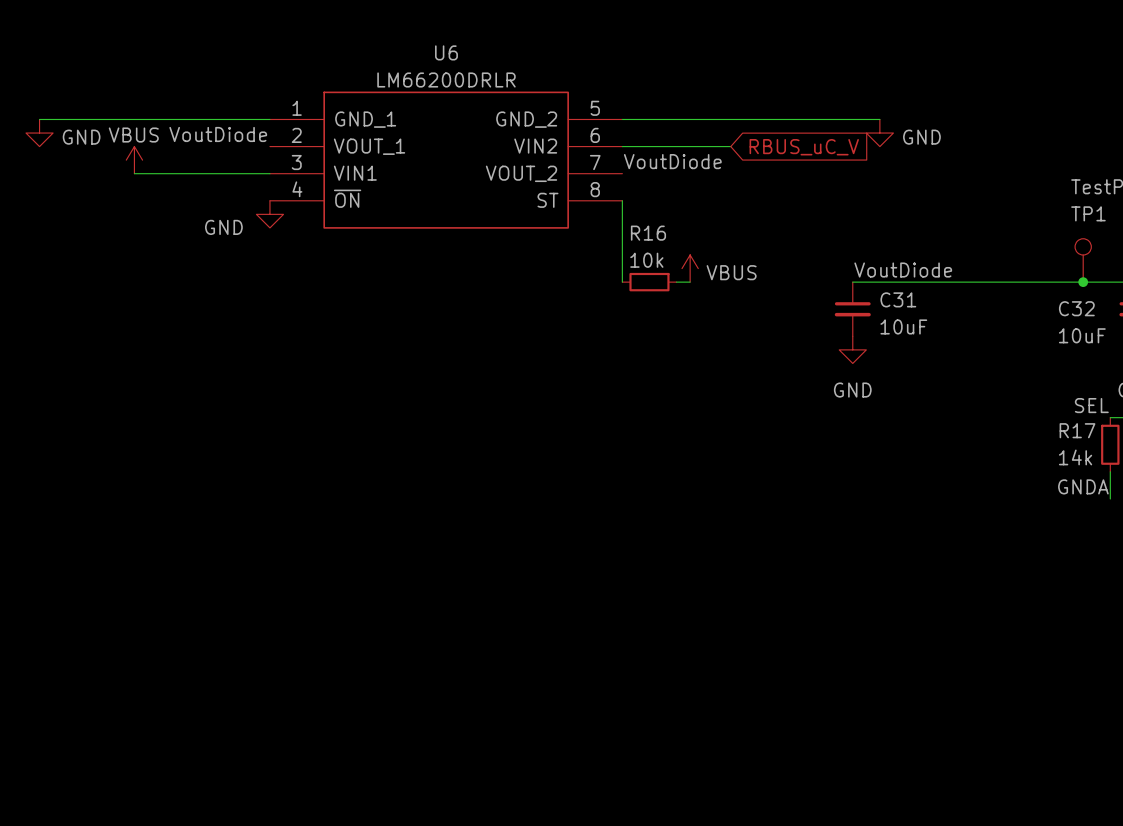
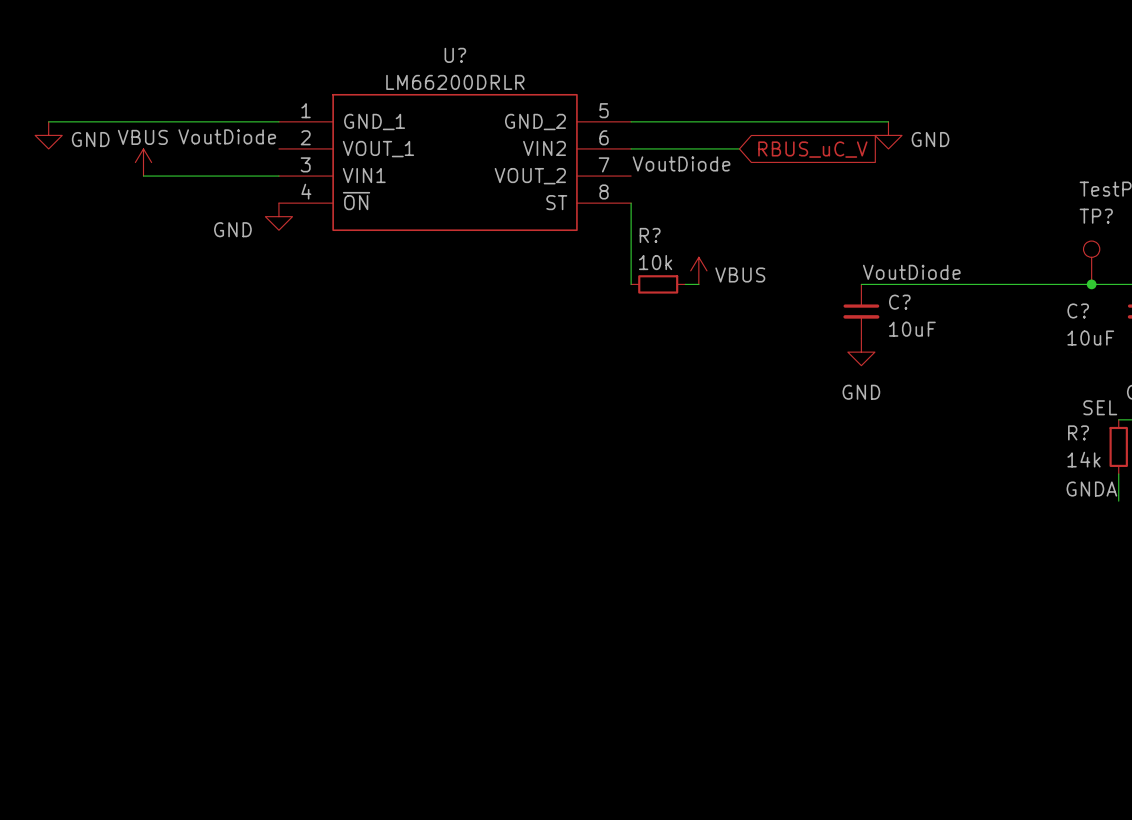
U6 name: U6 (446, 52) -> U? (455, 55)
TP1 name: TP1 (1088, 213) -> TP? (1096, 216)
R16 name: R16 (648, 233) -> R? (650, 235)
C31 name: C31 (898, 299) -> C? (899, 302)
C32 name: C32 (1076, 308) -> C? (1078, 310)
R17 name: R17 (1077, 430) -> R? (1078, 432)

